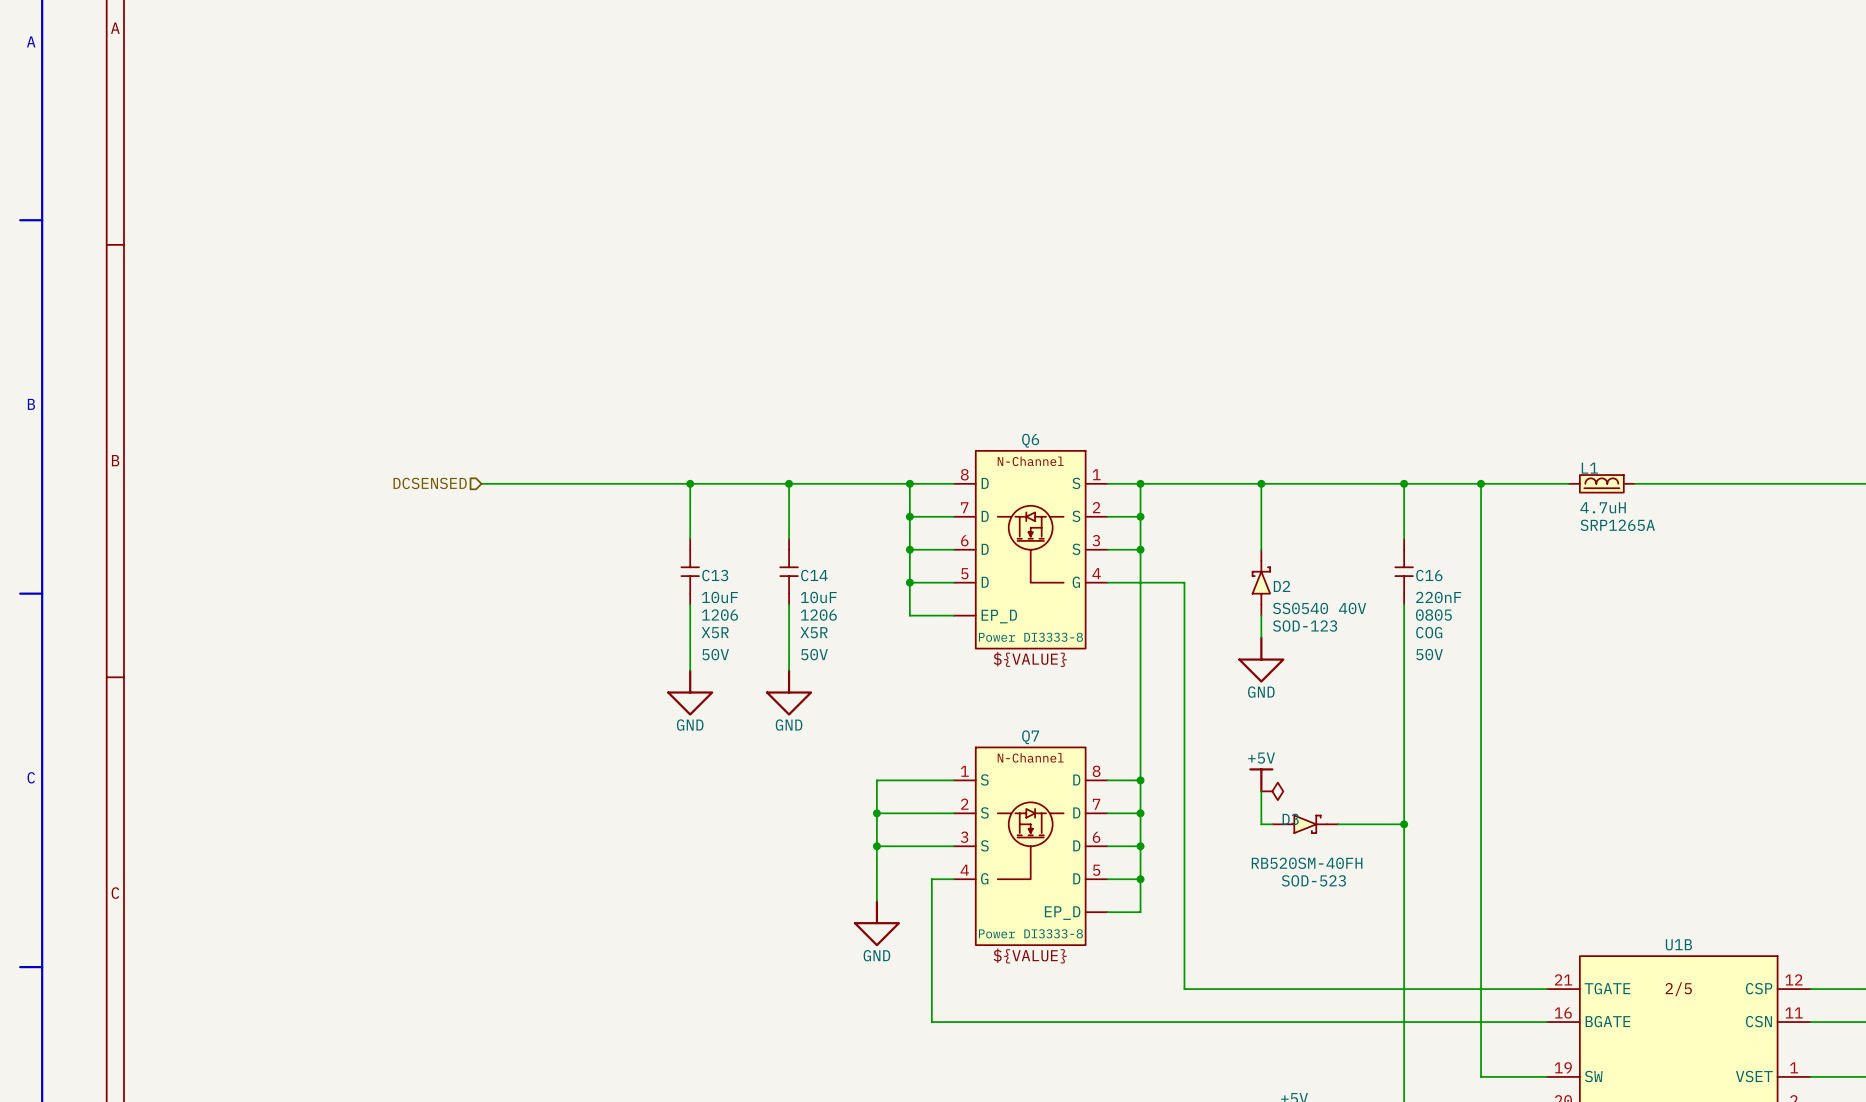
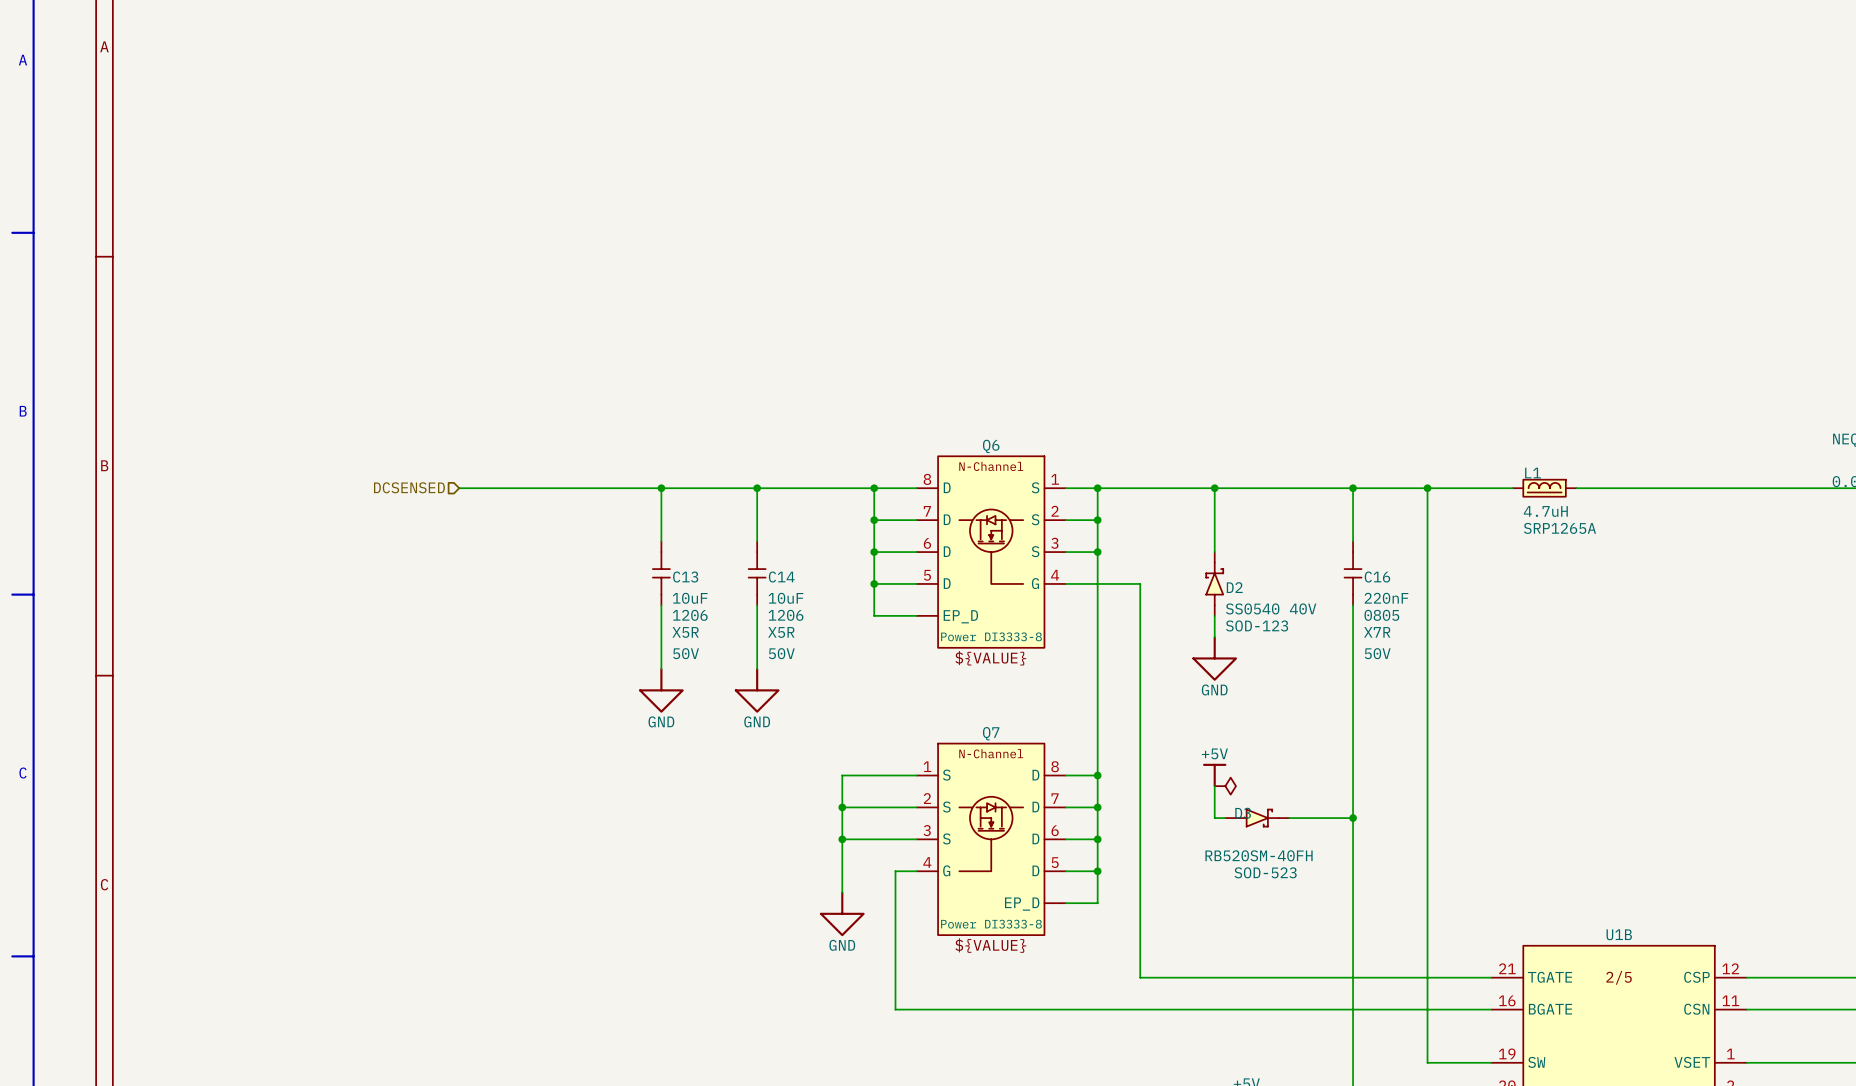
C16 text: COG (1429, 632) -> X7R (1377, 632)

